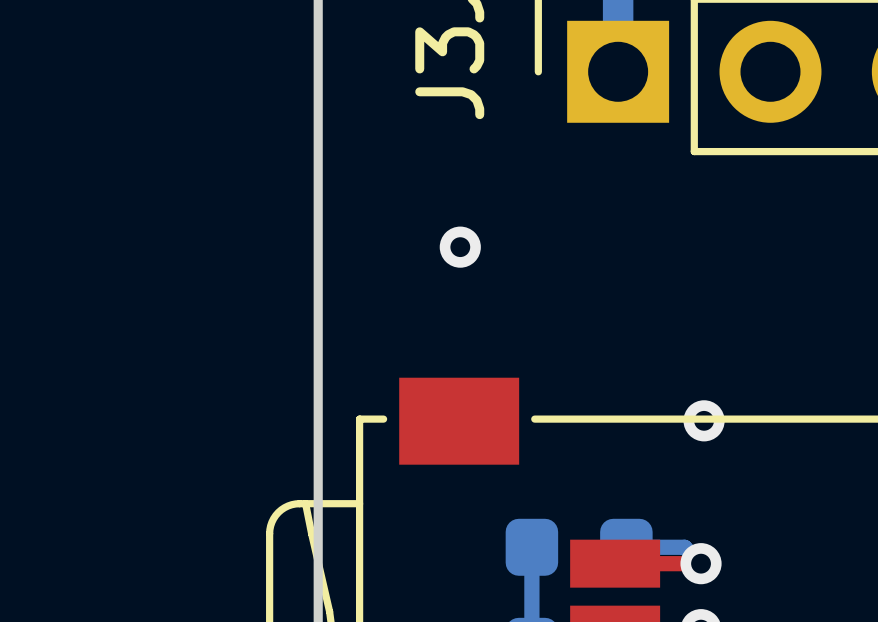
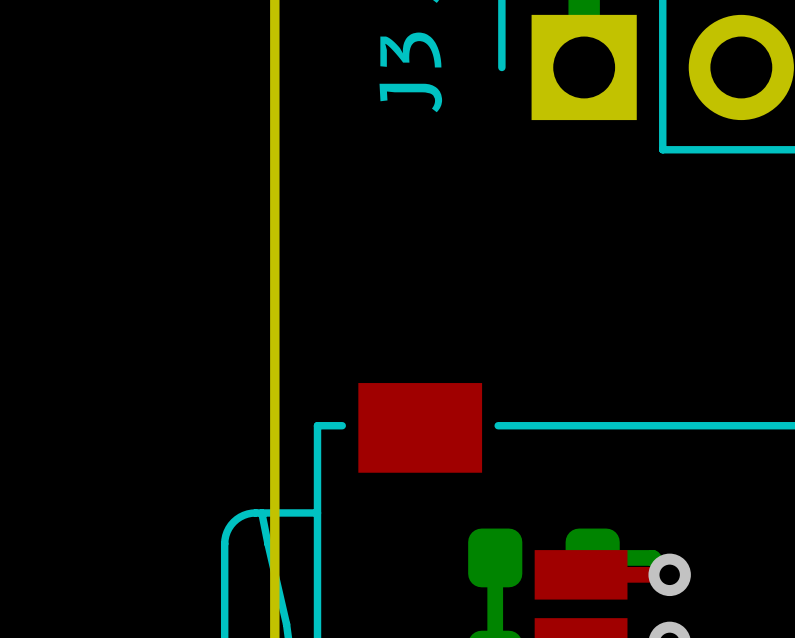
via: (460, 247) -> none
via: (704, 420) -> none

